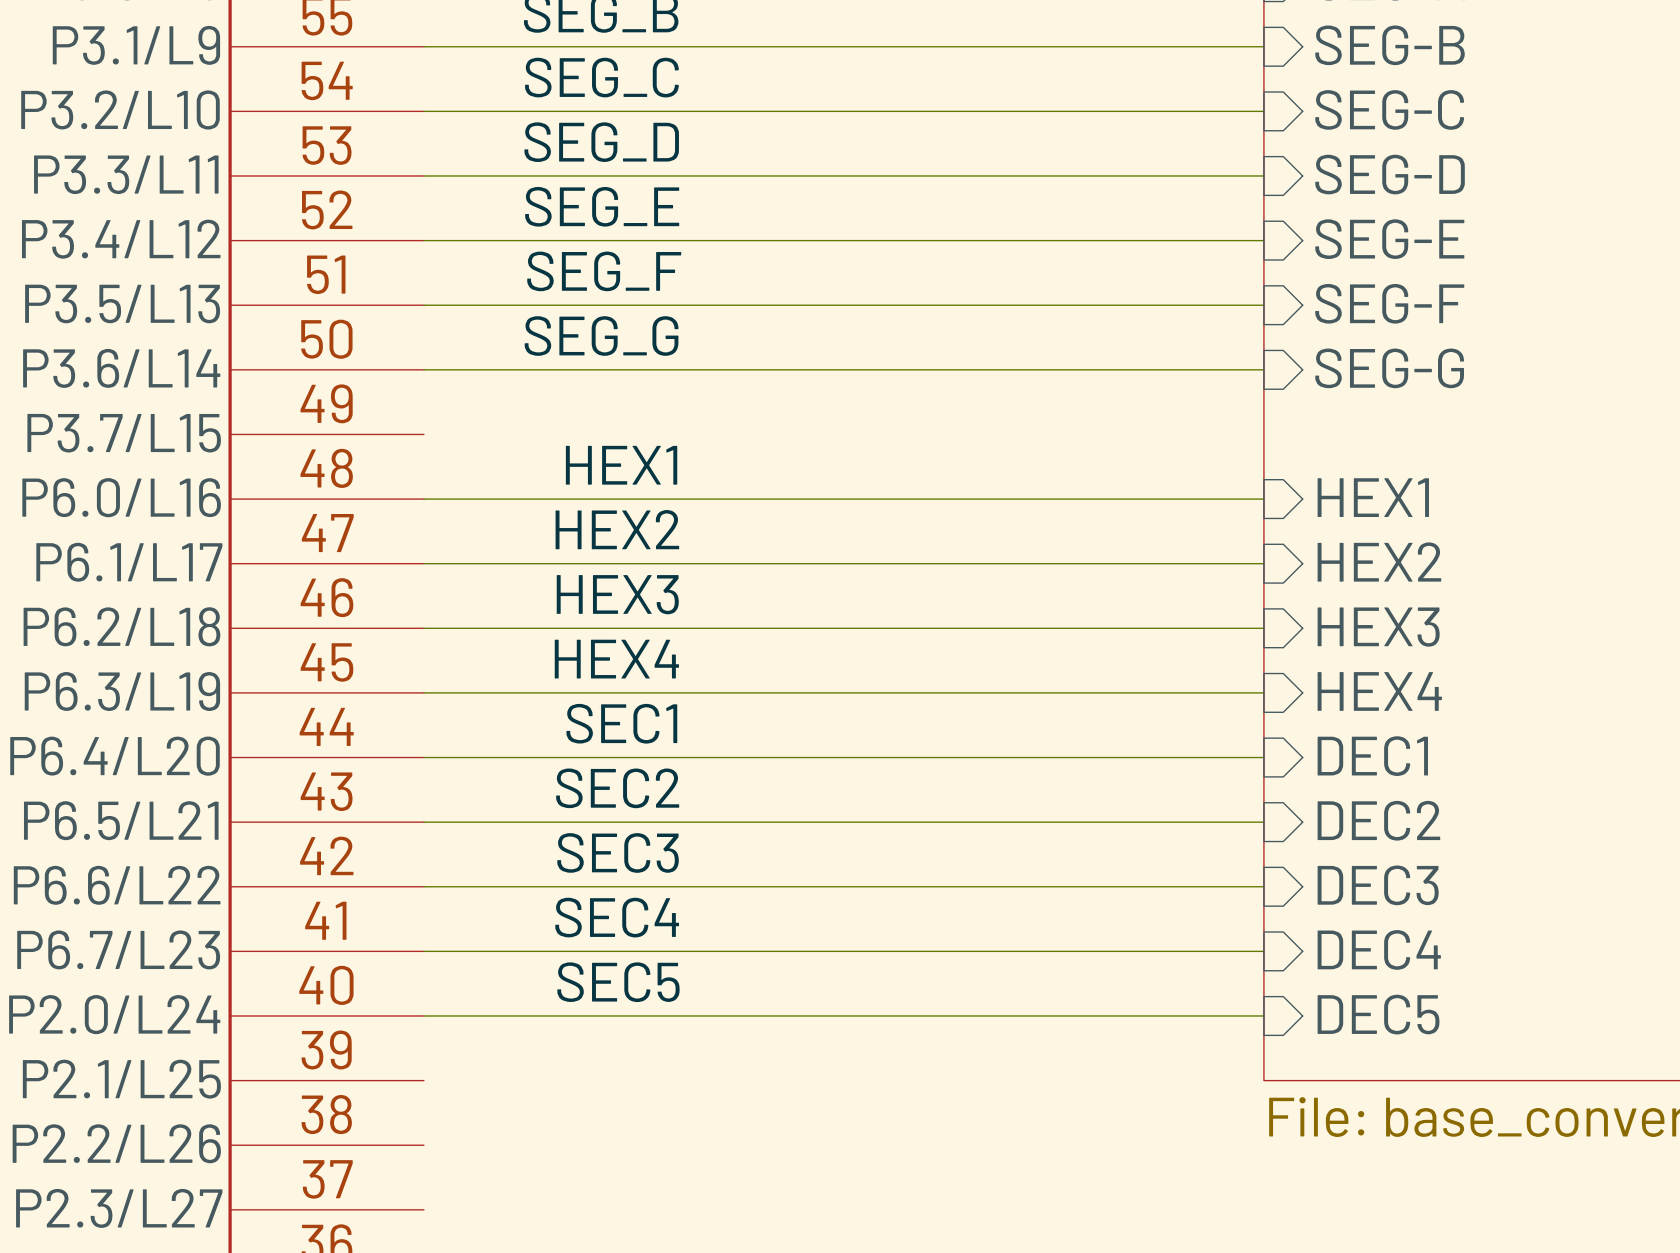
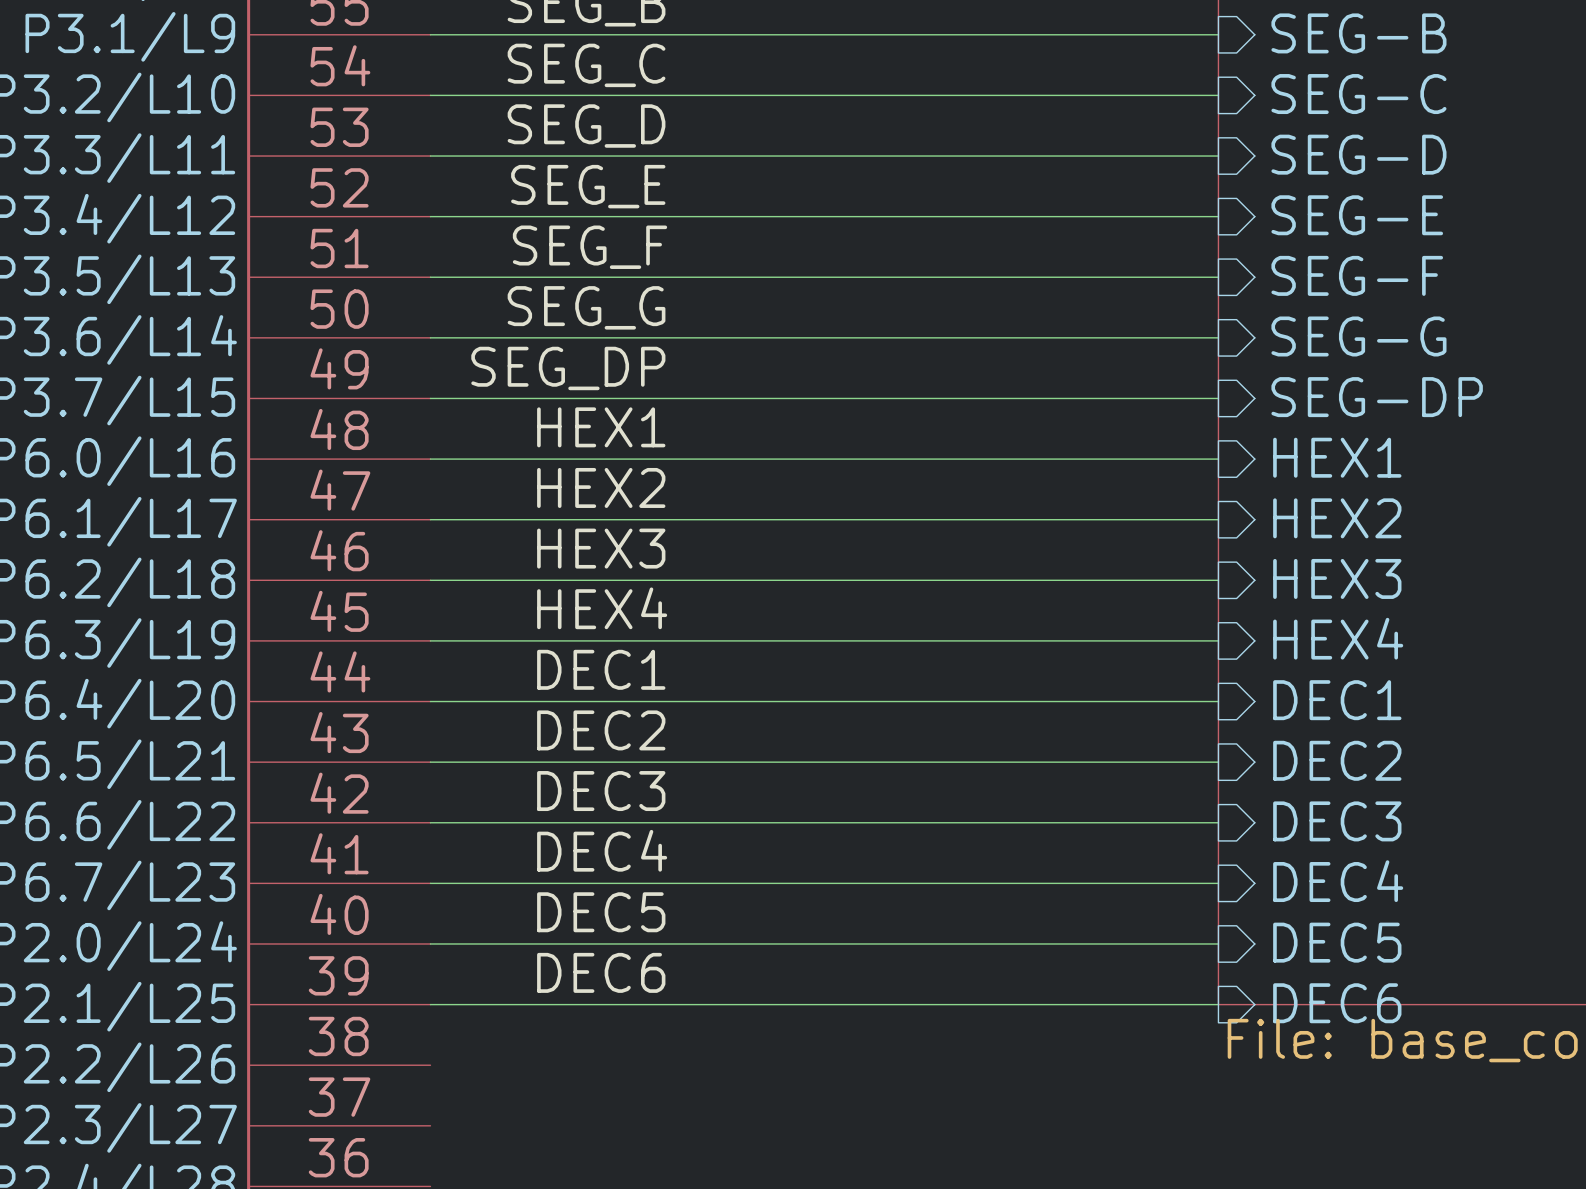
label: none -> SEG_DP (568, 368)
sheet pin: none -> SEG-DP (1377, 397)
wire: none -> (430, 398) (1218, 398)
label: SEC1 (621, 723) -> DEC1 (601, 669)
label: SEC2 (617, 788) -> DEC2 (601, 730)
label: SEC3 (618, 852) -> DEC3 (601, 791)
label: SEC4 (617, 917) -> DEC4 (602, 850)
label: SEC5 (618, 982) -> DEC5 (601, 912)
label: none -> DEC6 (601, 972)
sheet pin: none -> DEC6 (1337, 1003)
wire: none -> (430, 1004) (1218, 1004)

